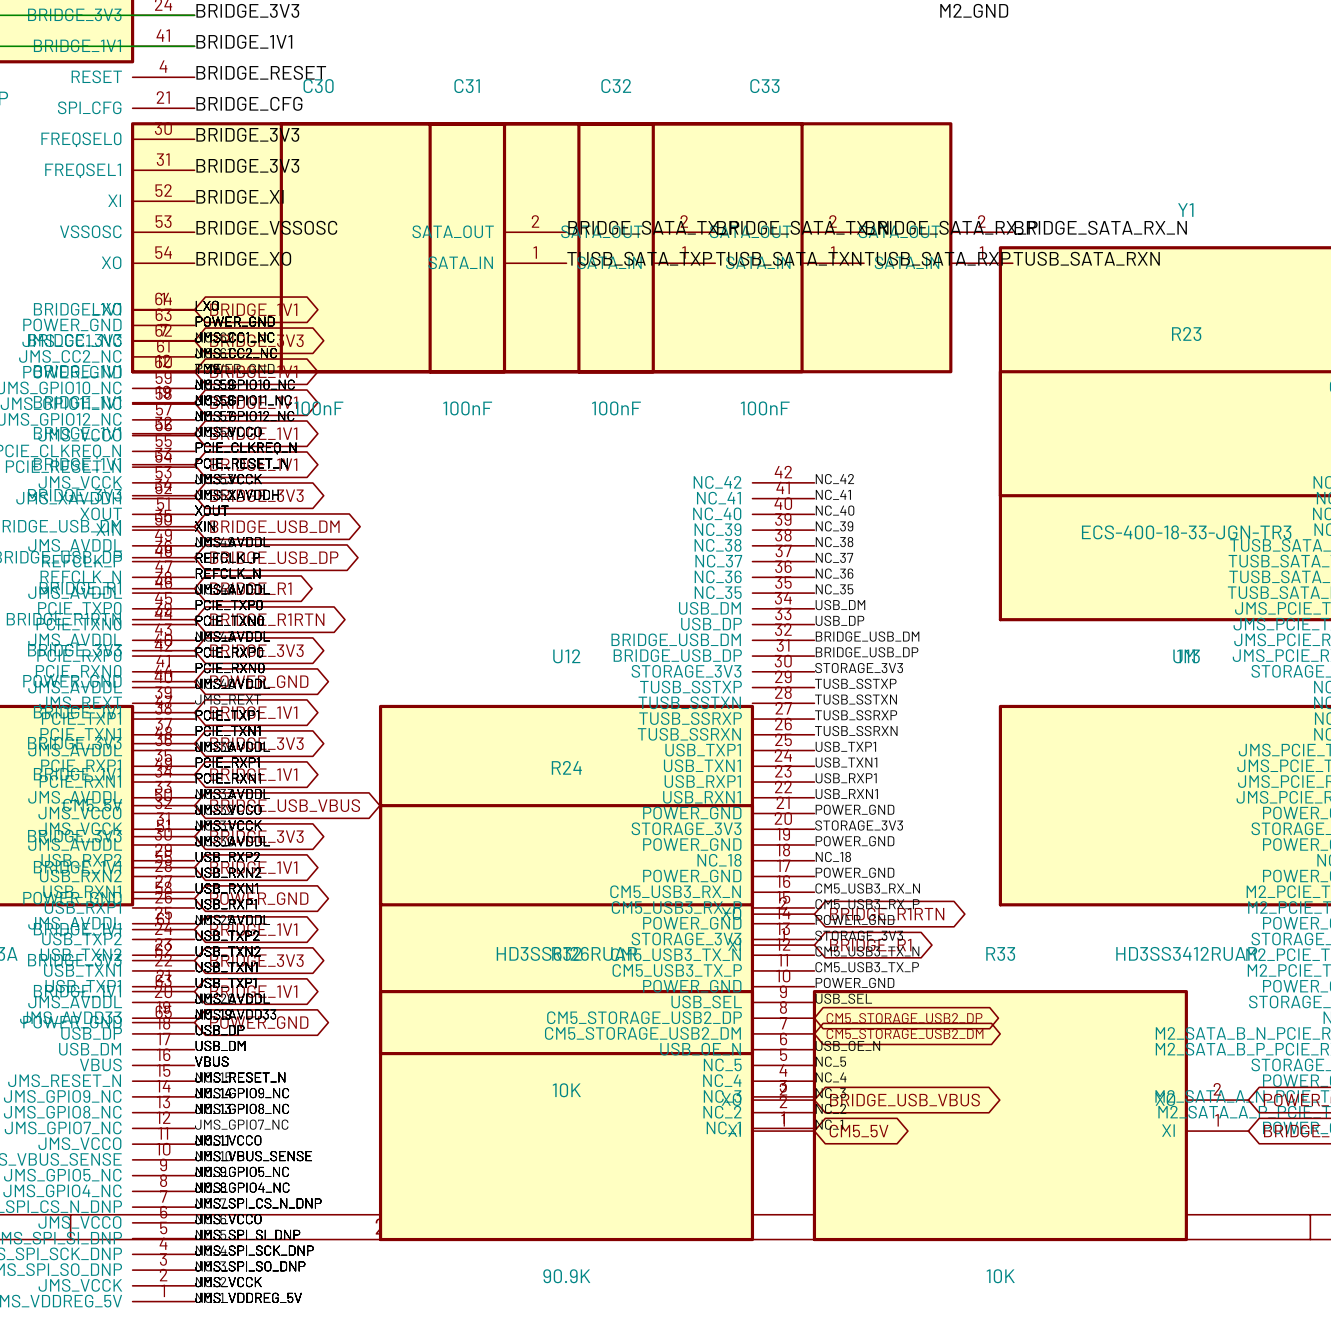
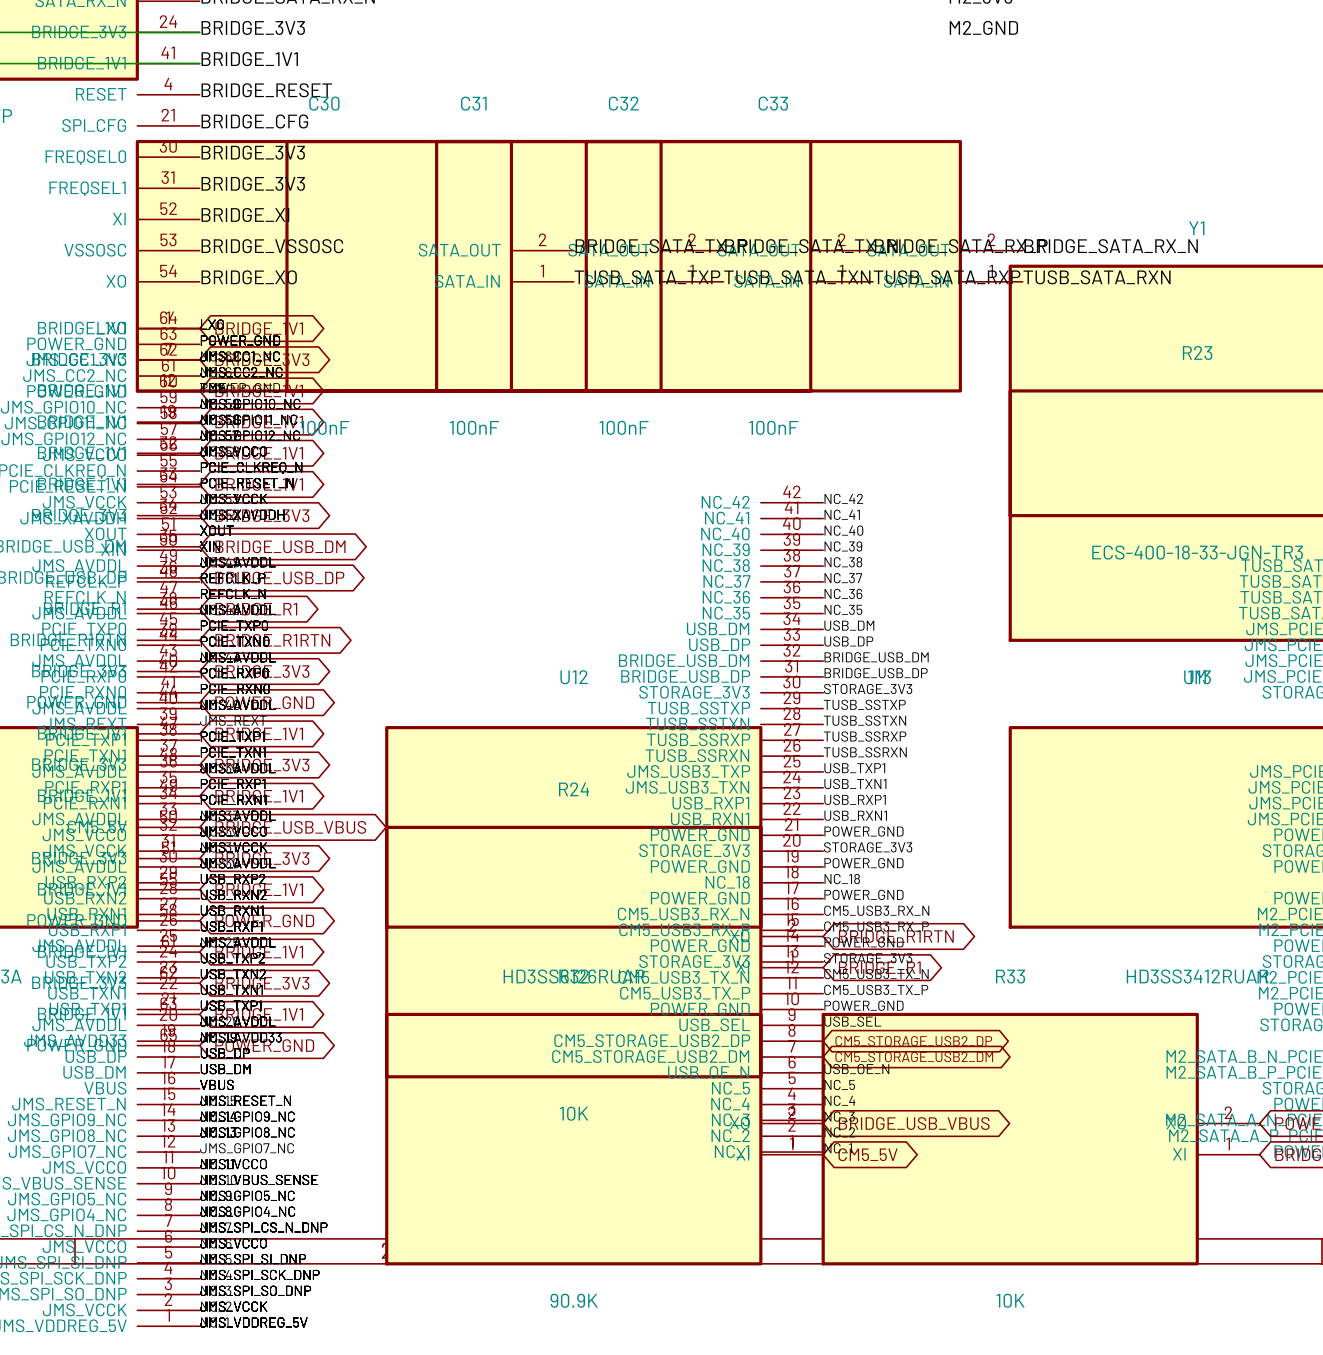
U12 pin name: USB_TXP1 (703, 750) -> JMS_USB3_TXP (688, 771)
U12 pin name: USB_TXN1 (702, 765) -> JMS_USB3_TXN (687, 787)

